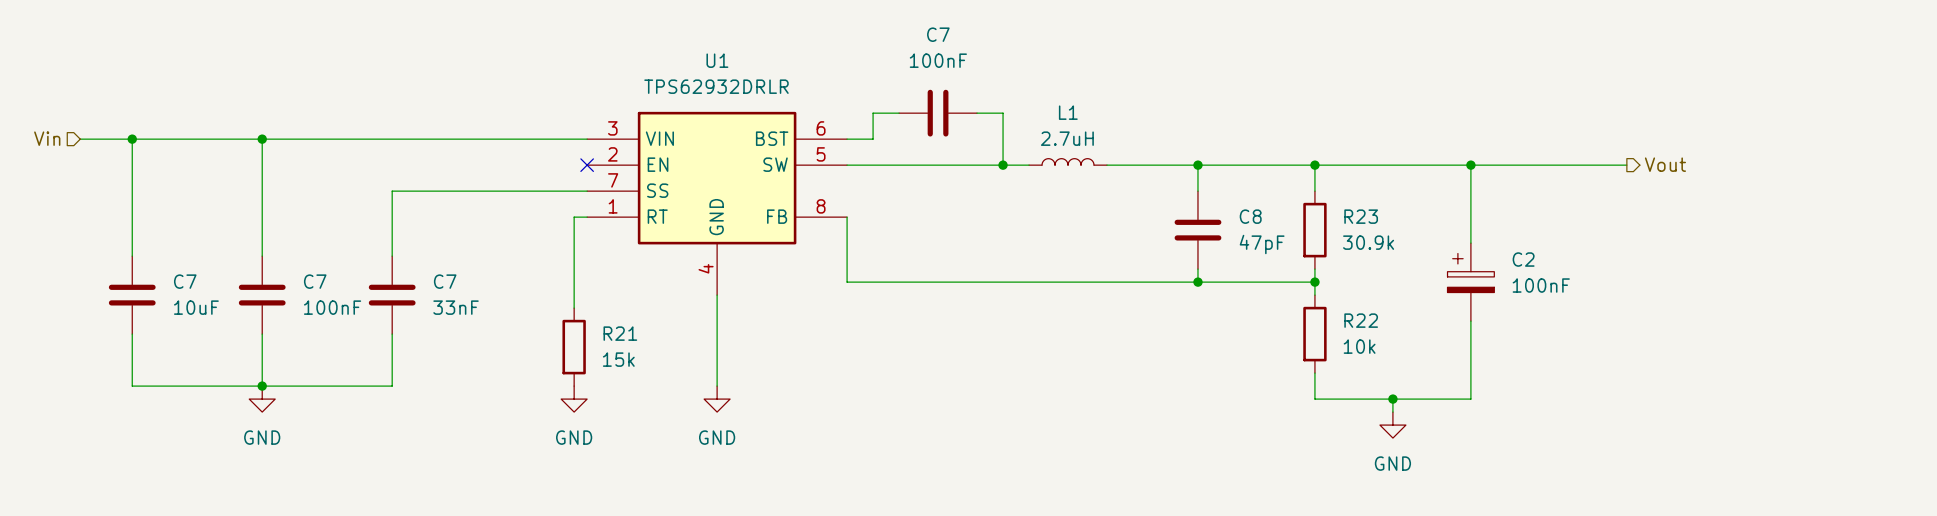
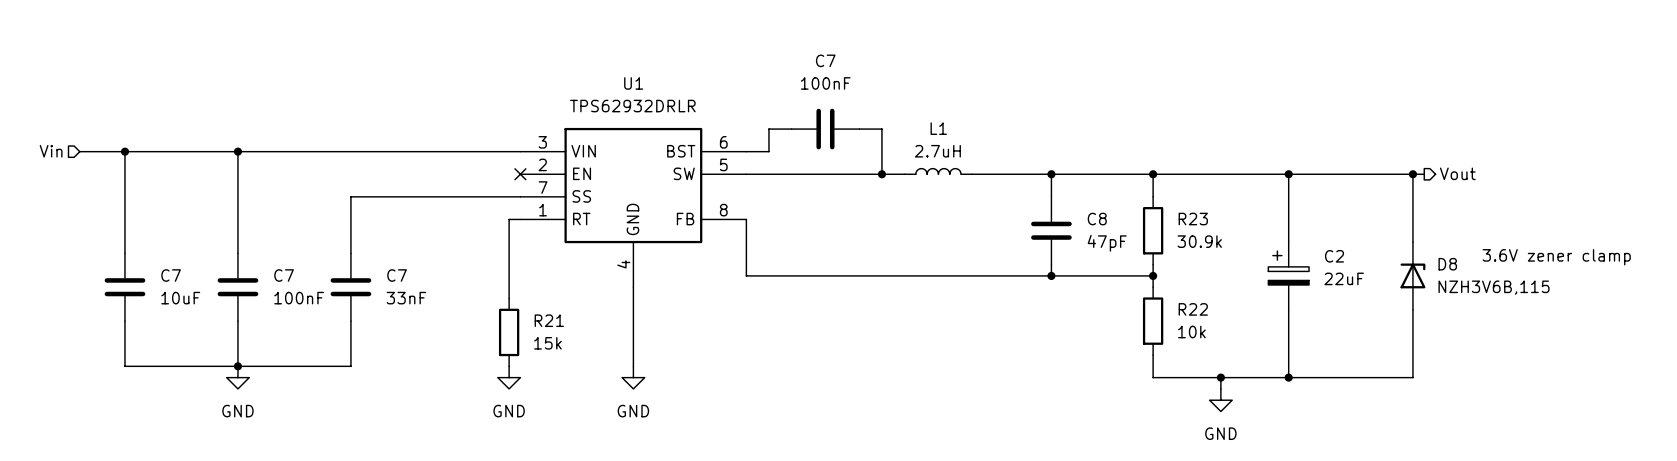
wire: none -> (1412, 174) (1412, 242)
junction: none -> (1412, 174)
text: none -> 3.6V zener clamp (1556, 257)
D8: none -> NZH3V6B,115 (1412, 275)
C2 value: 100nF (1541, 285) -> 22uF (1344, 278)
wire: none -> (1412, 309) (1412, 377) (1288, 377)
junction: none -> (1288, 377)

